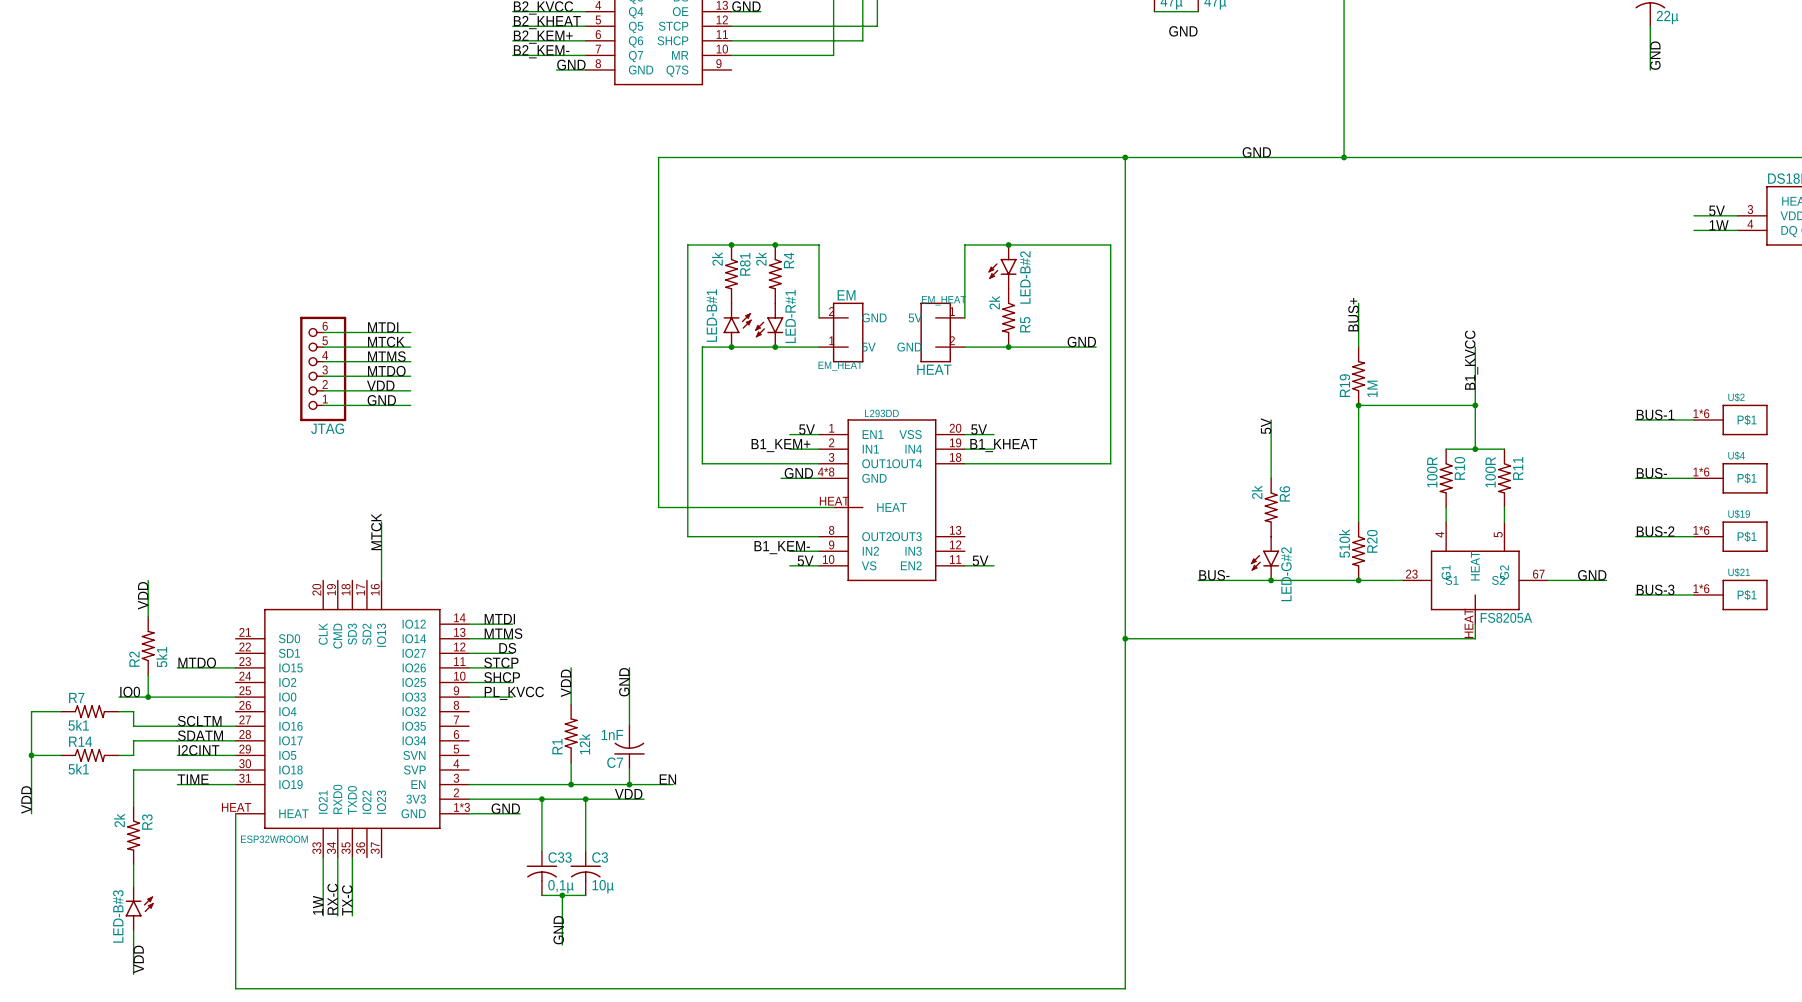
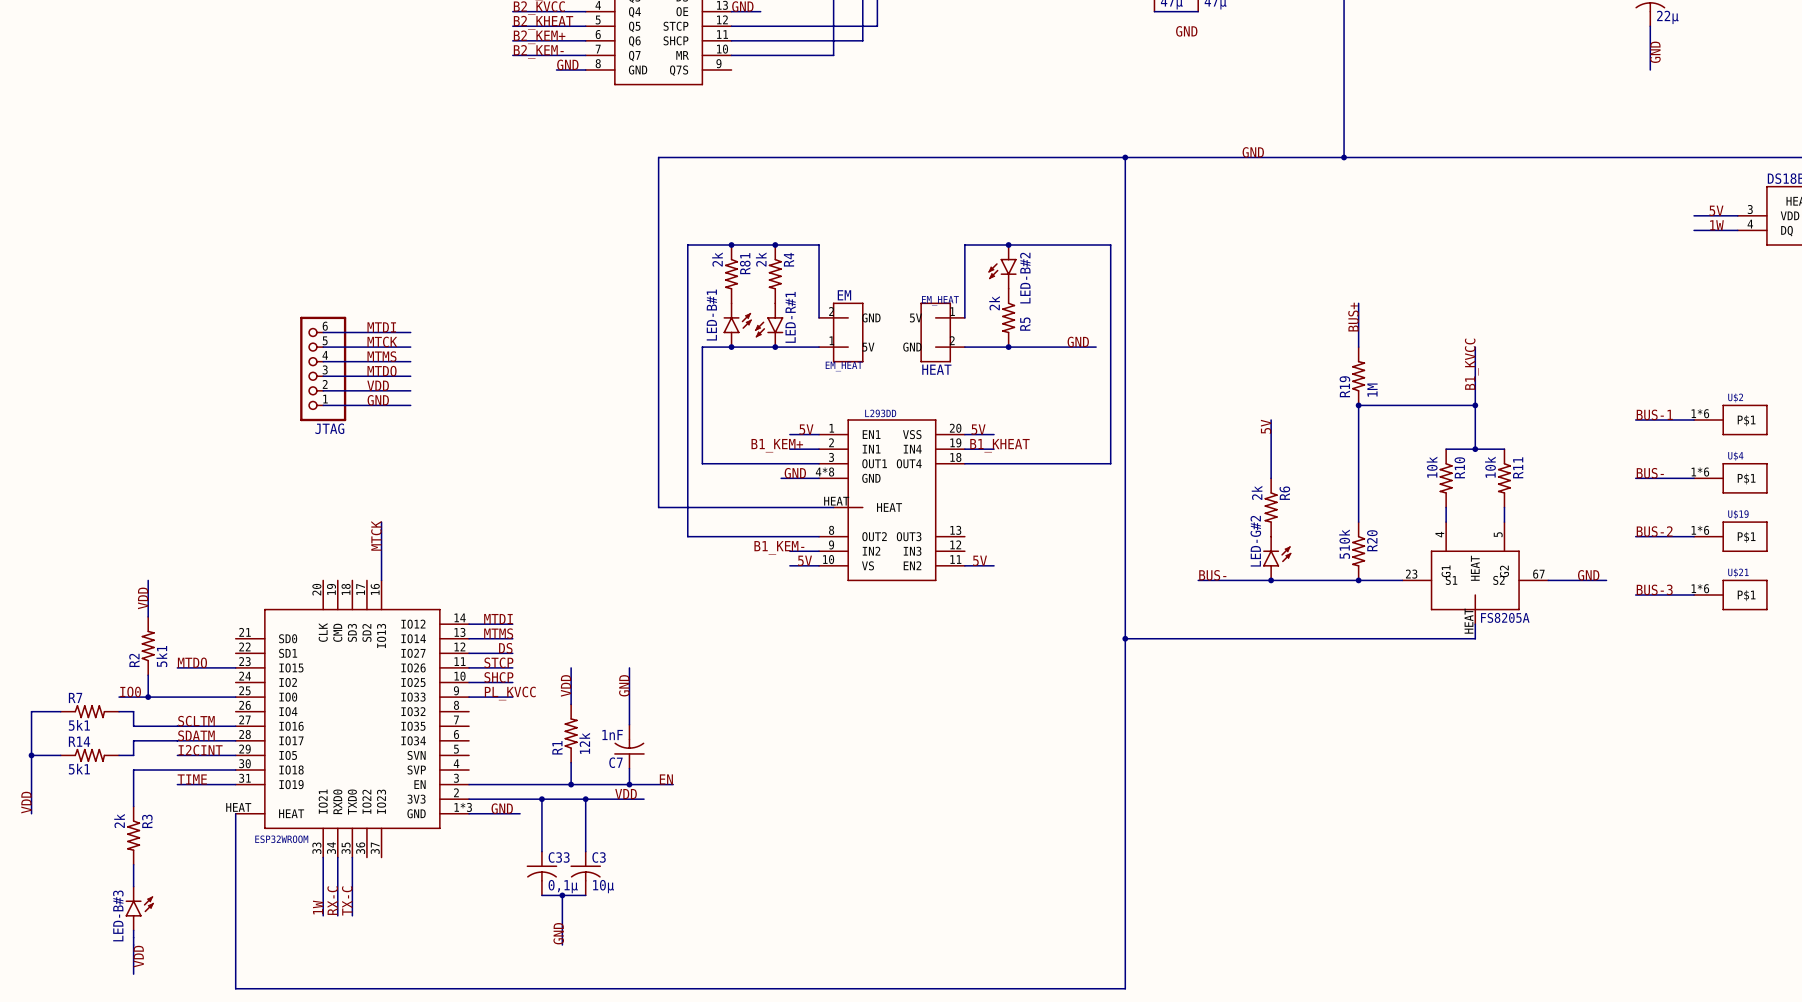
R10 value: 100R (1432, 472) -> 10k (1432, 467)
R11 value: 100R (1490, 472) -> 10k (1490, 467)
LED-G#2 rotation: 0° (1265, 560) -> 180° (1277, 556)

